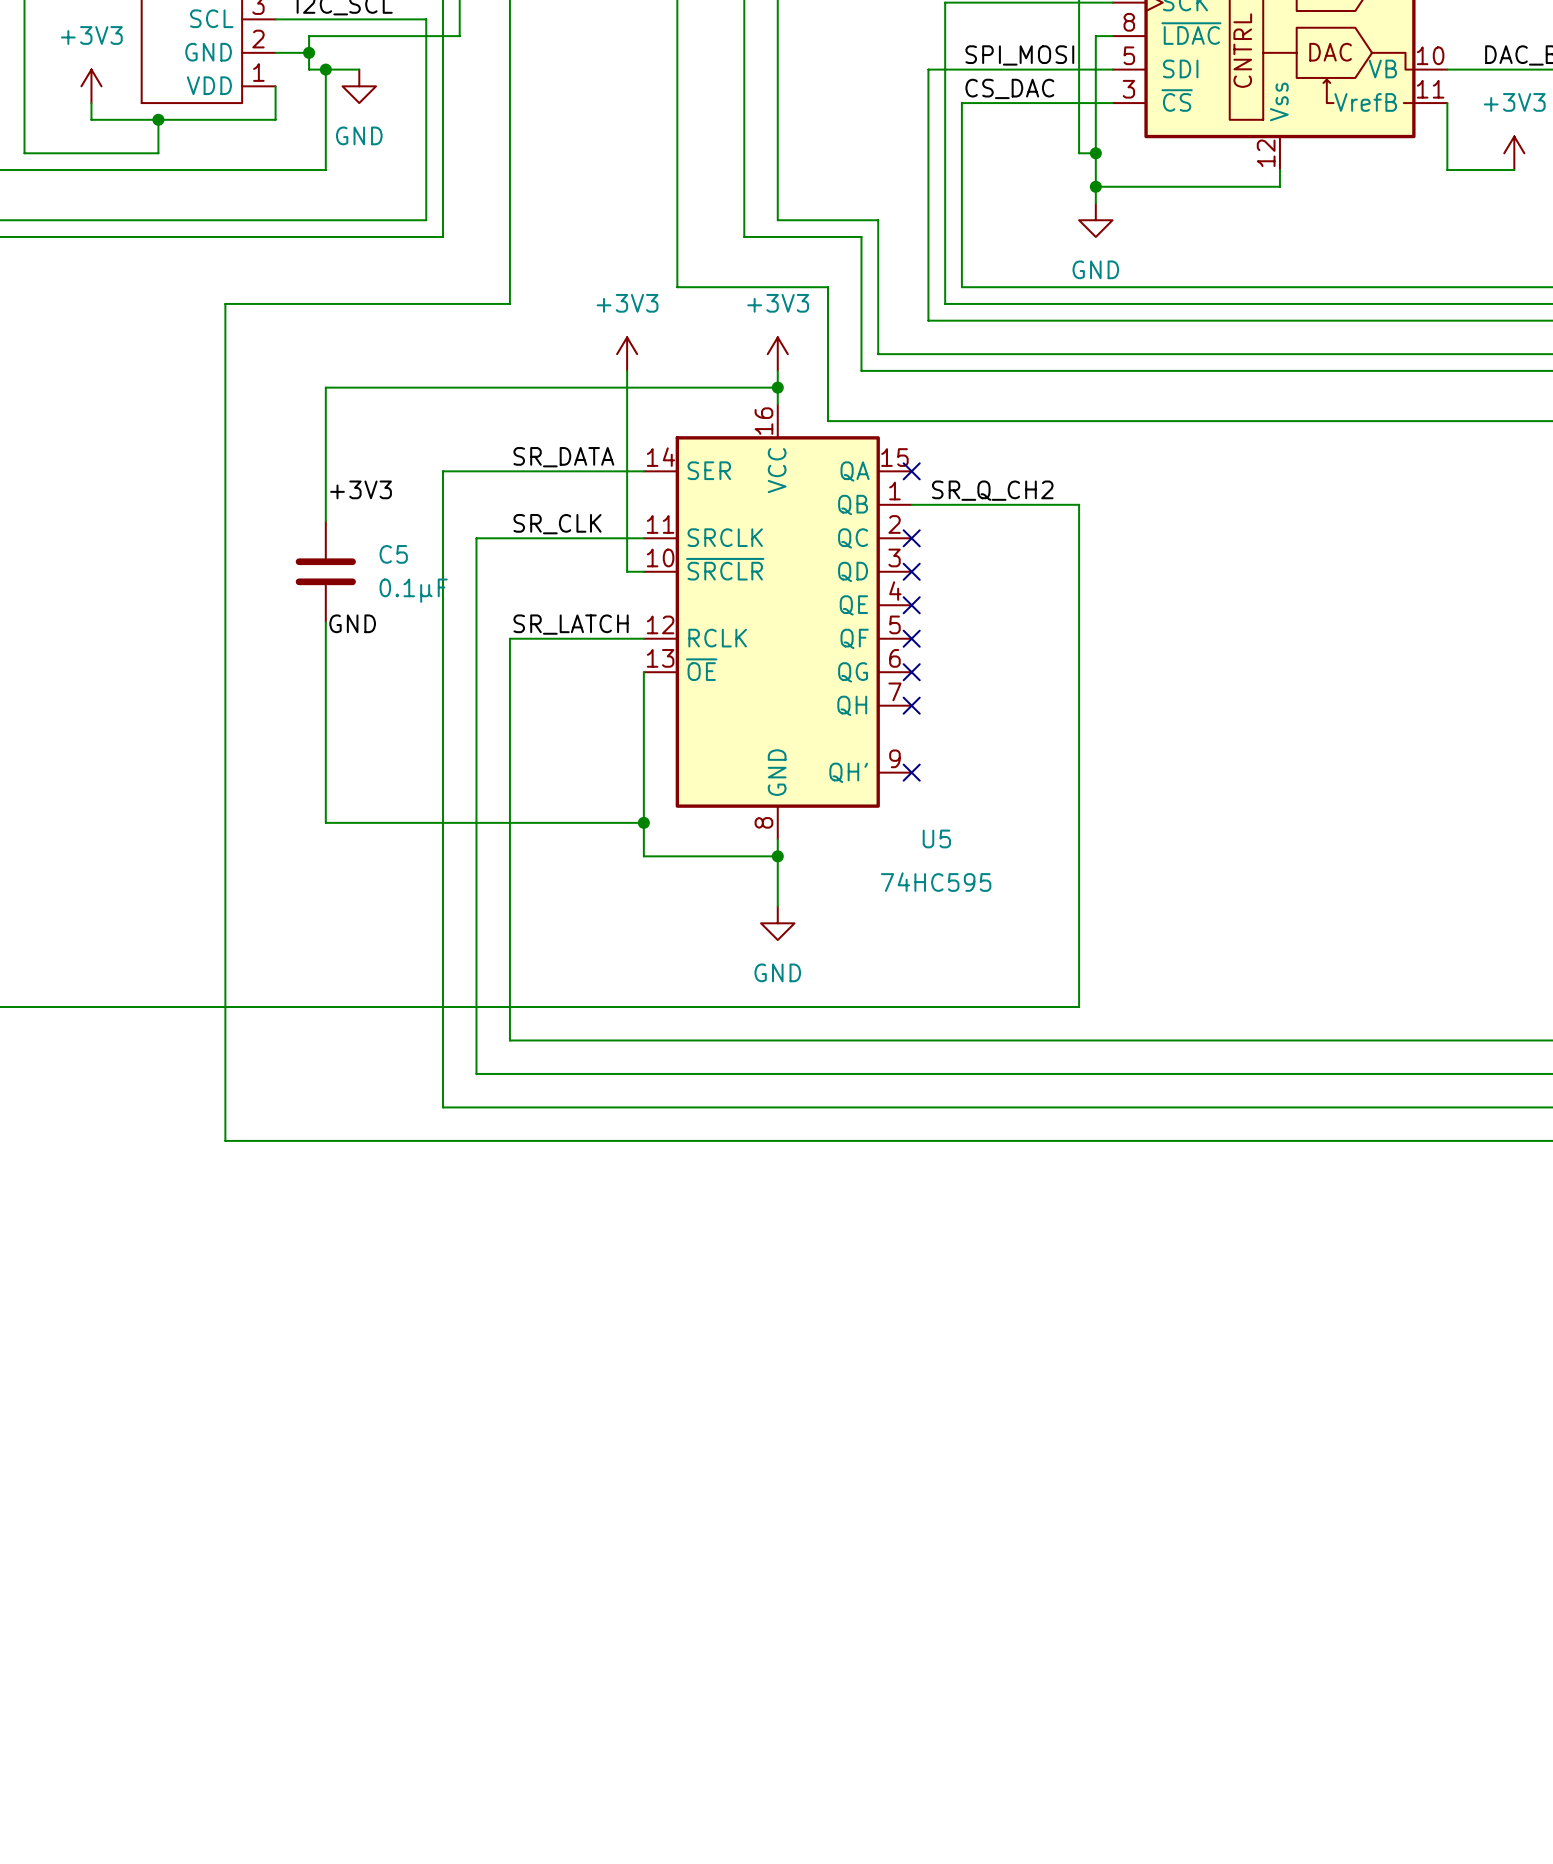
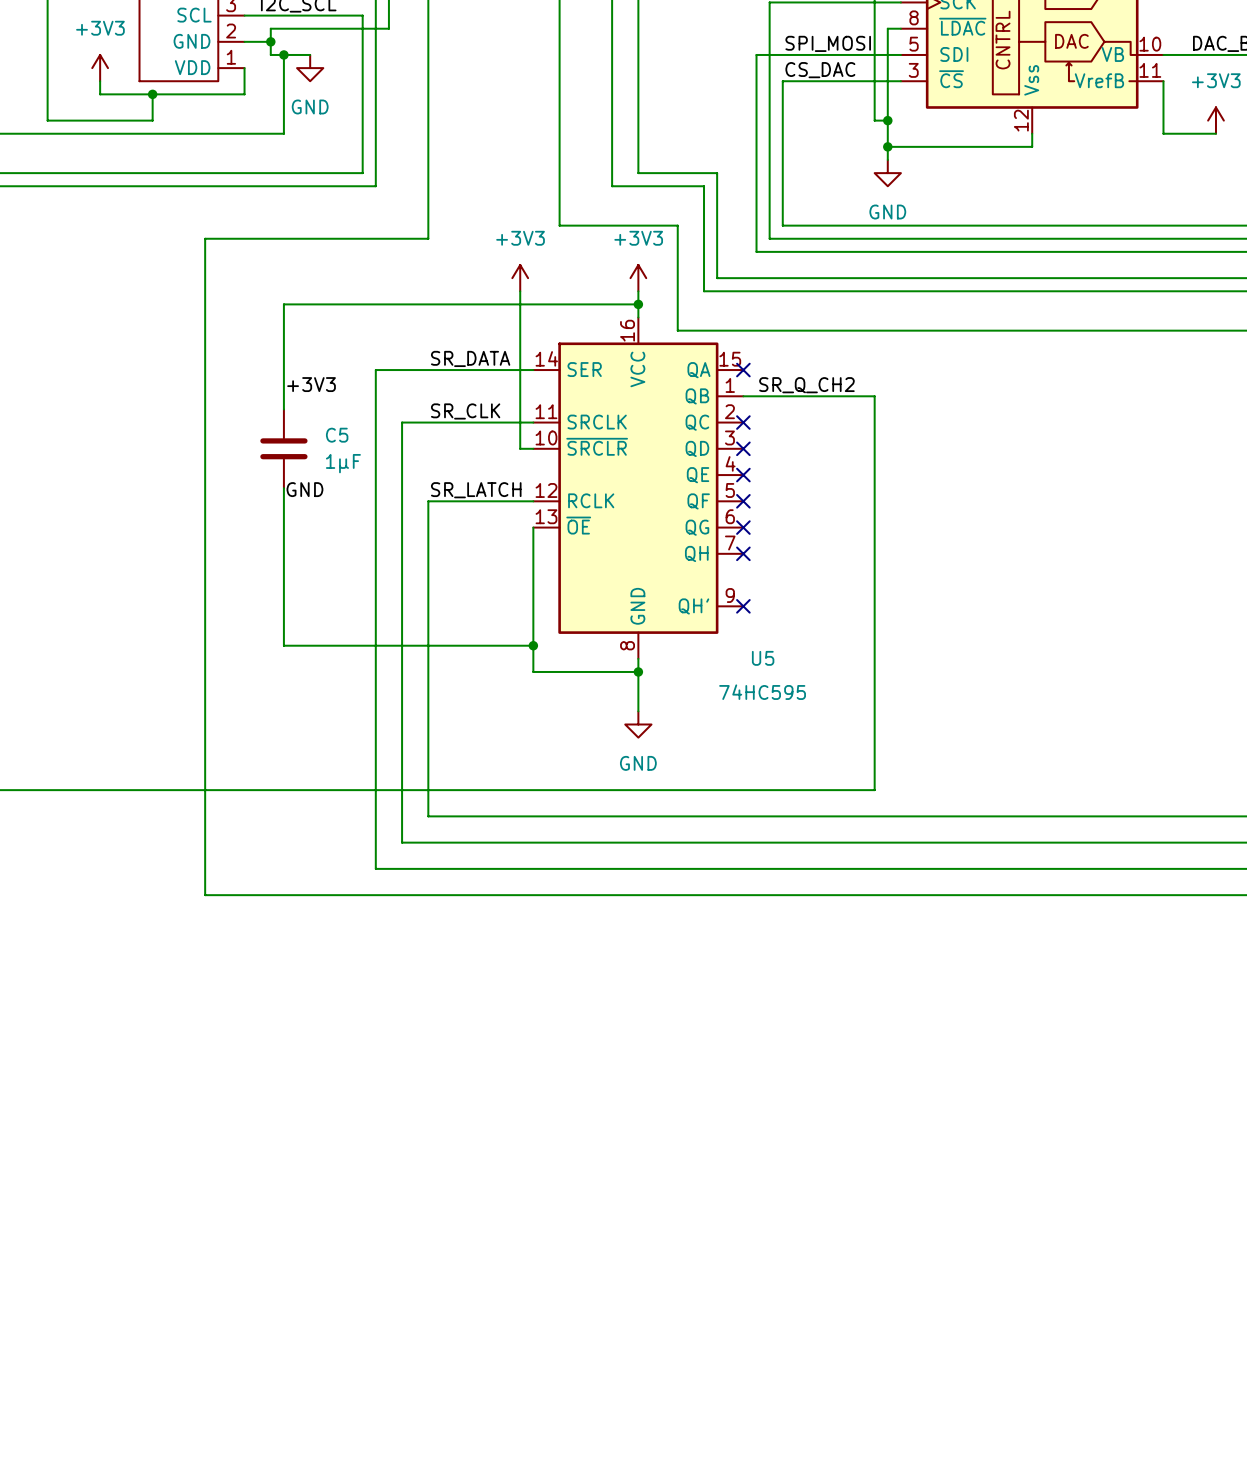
C5 value: 0.1µF (413, 590) -> 1µF (343, 463)

